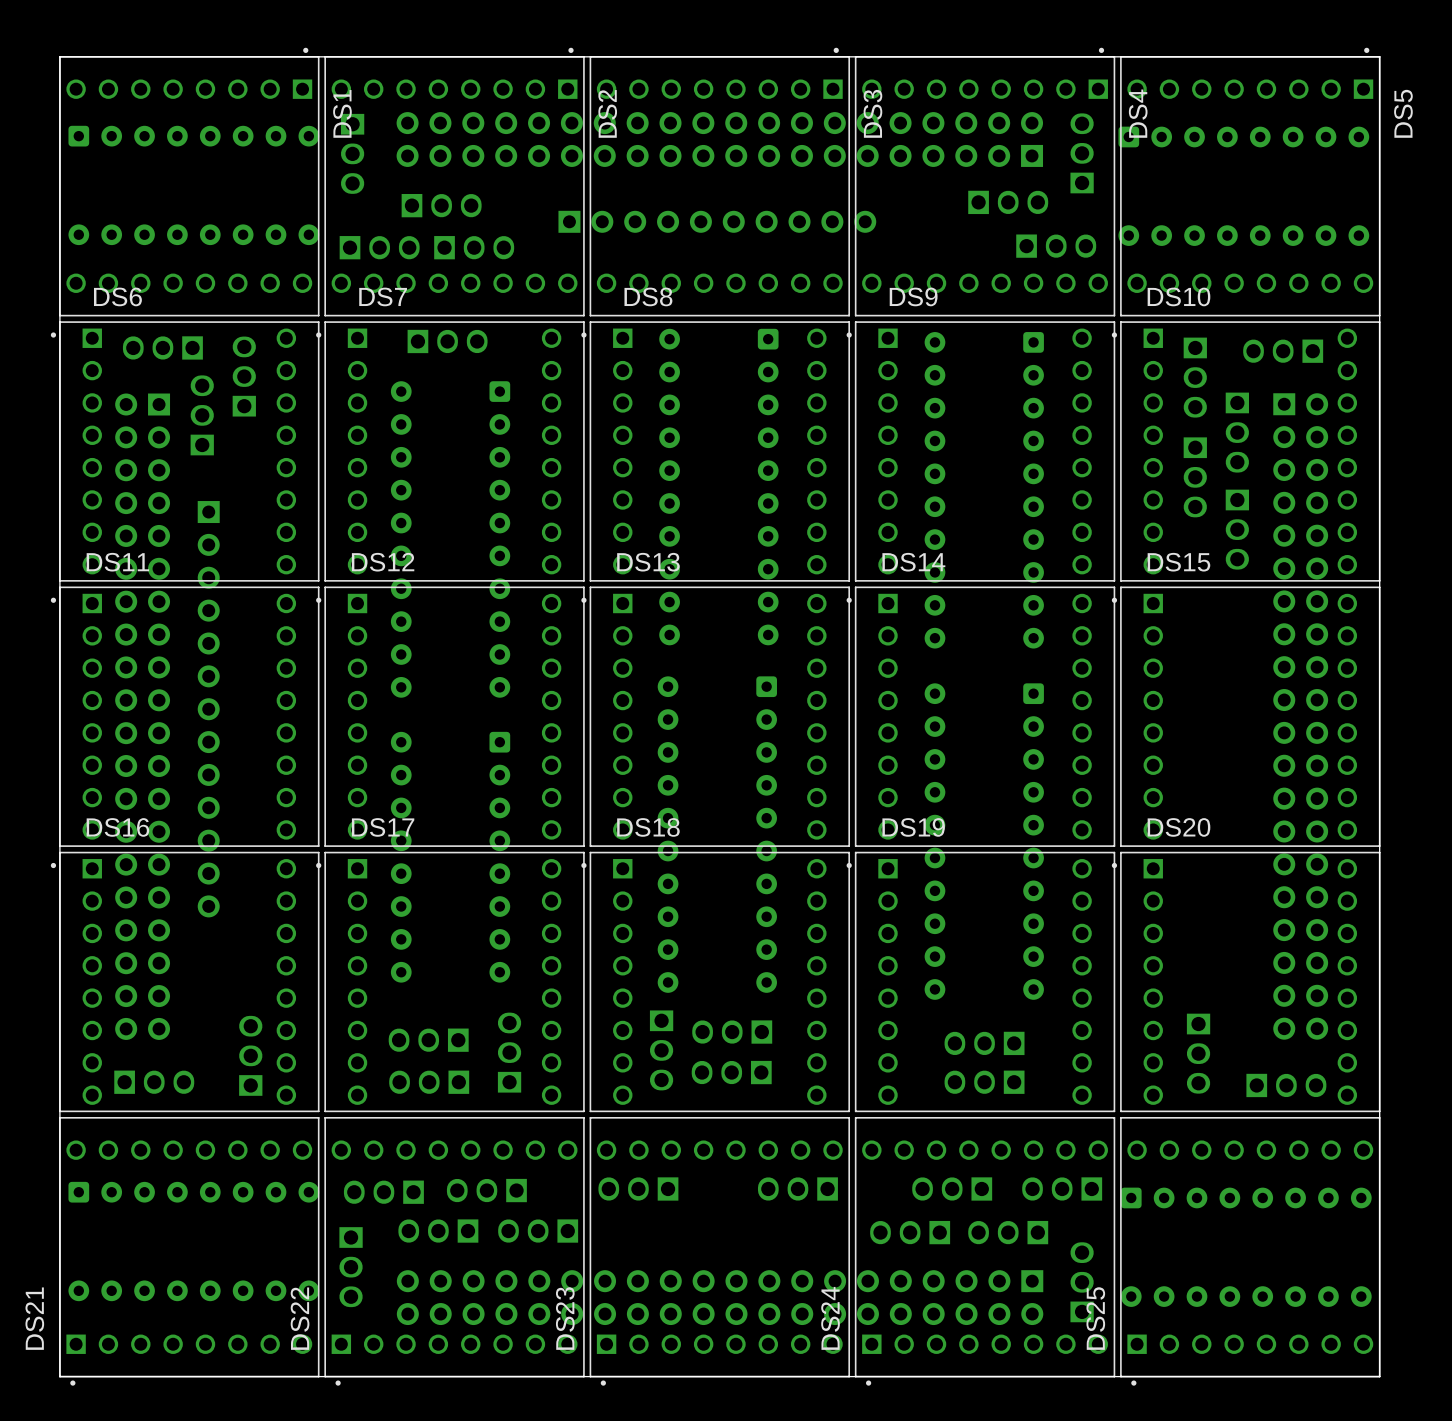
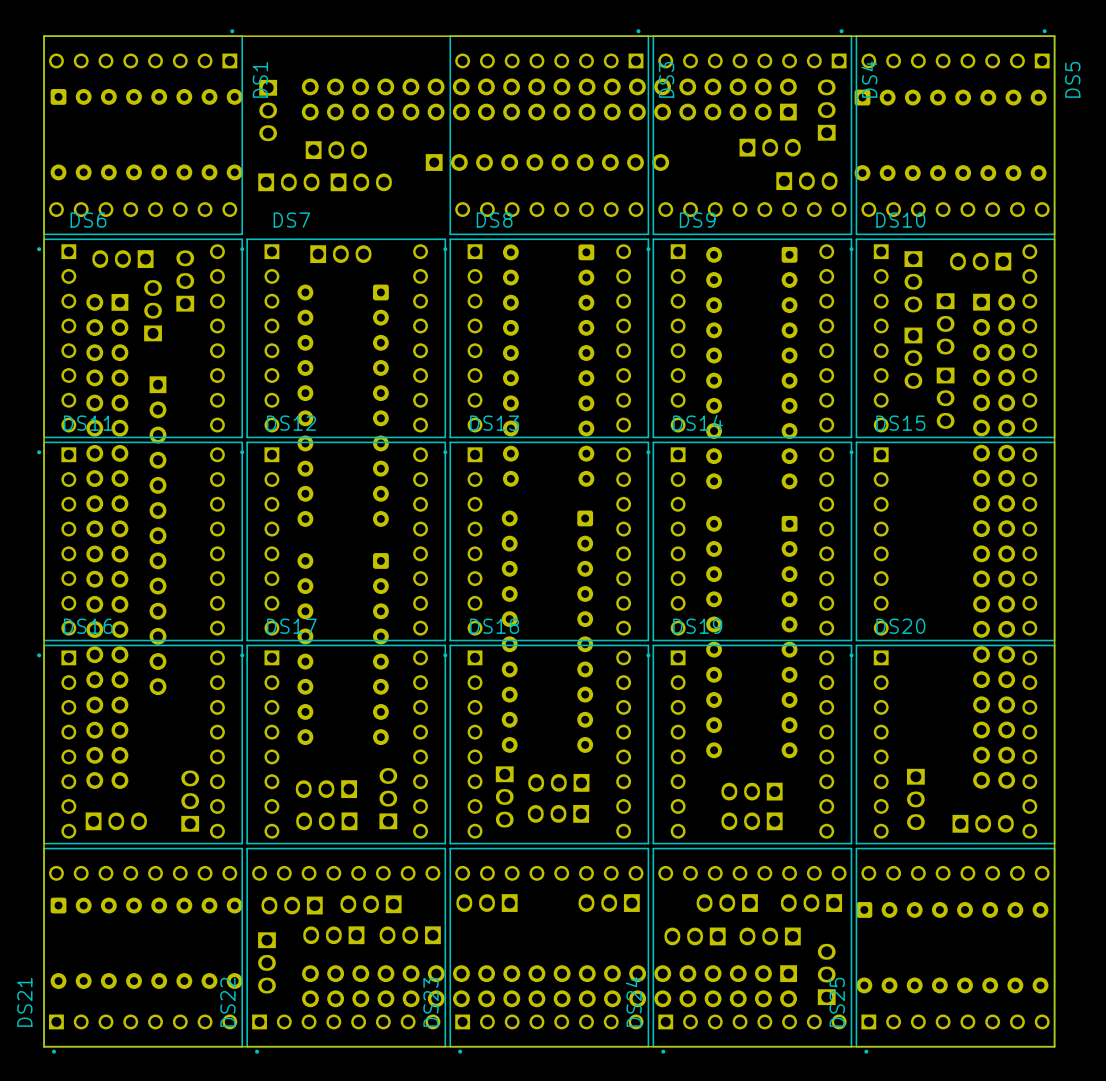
DS2: (454, 182) -> none

